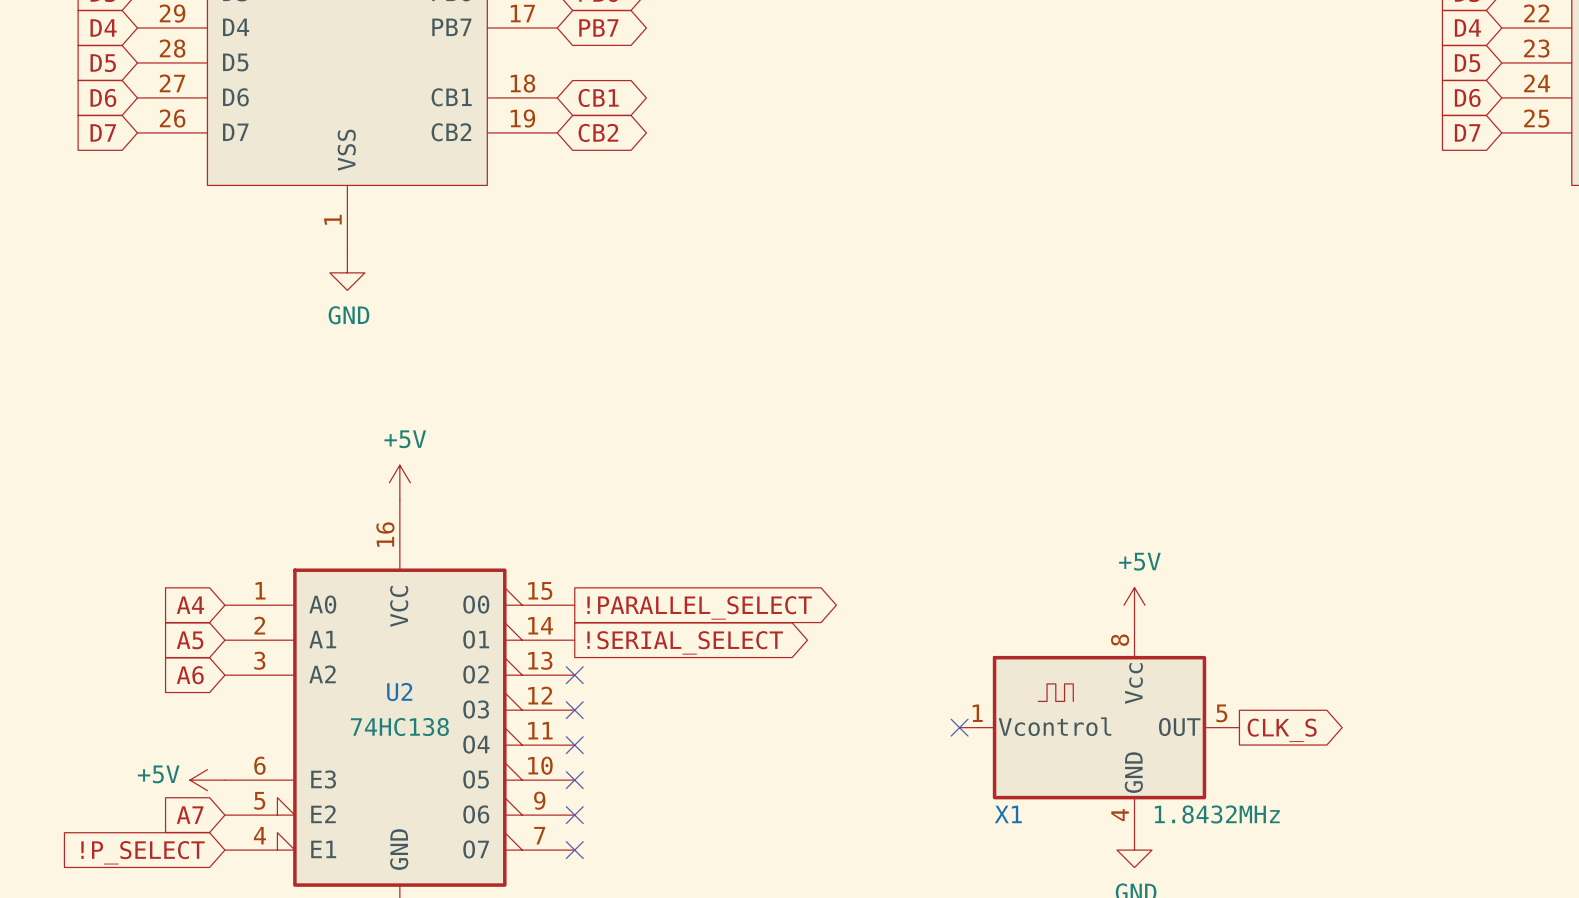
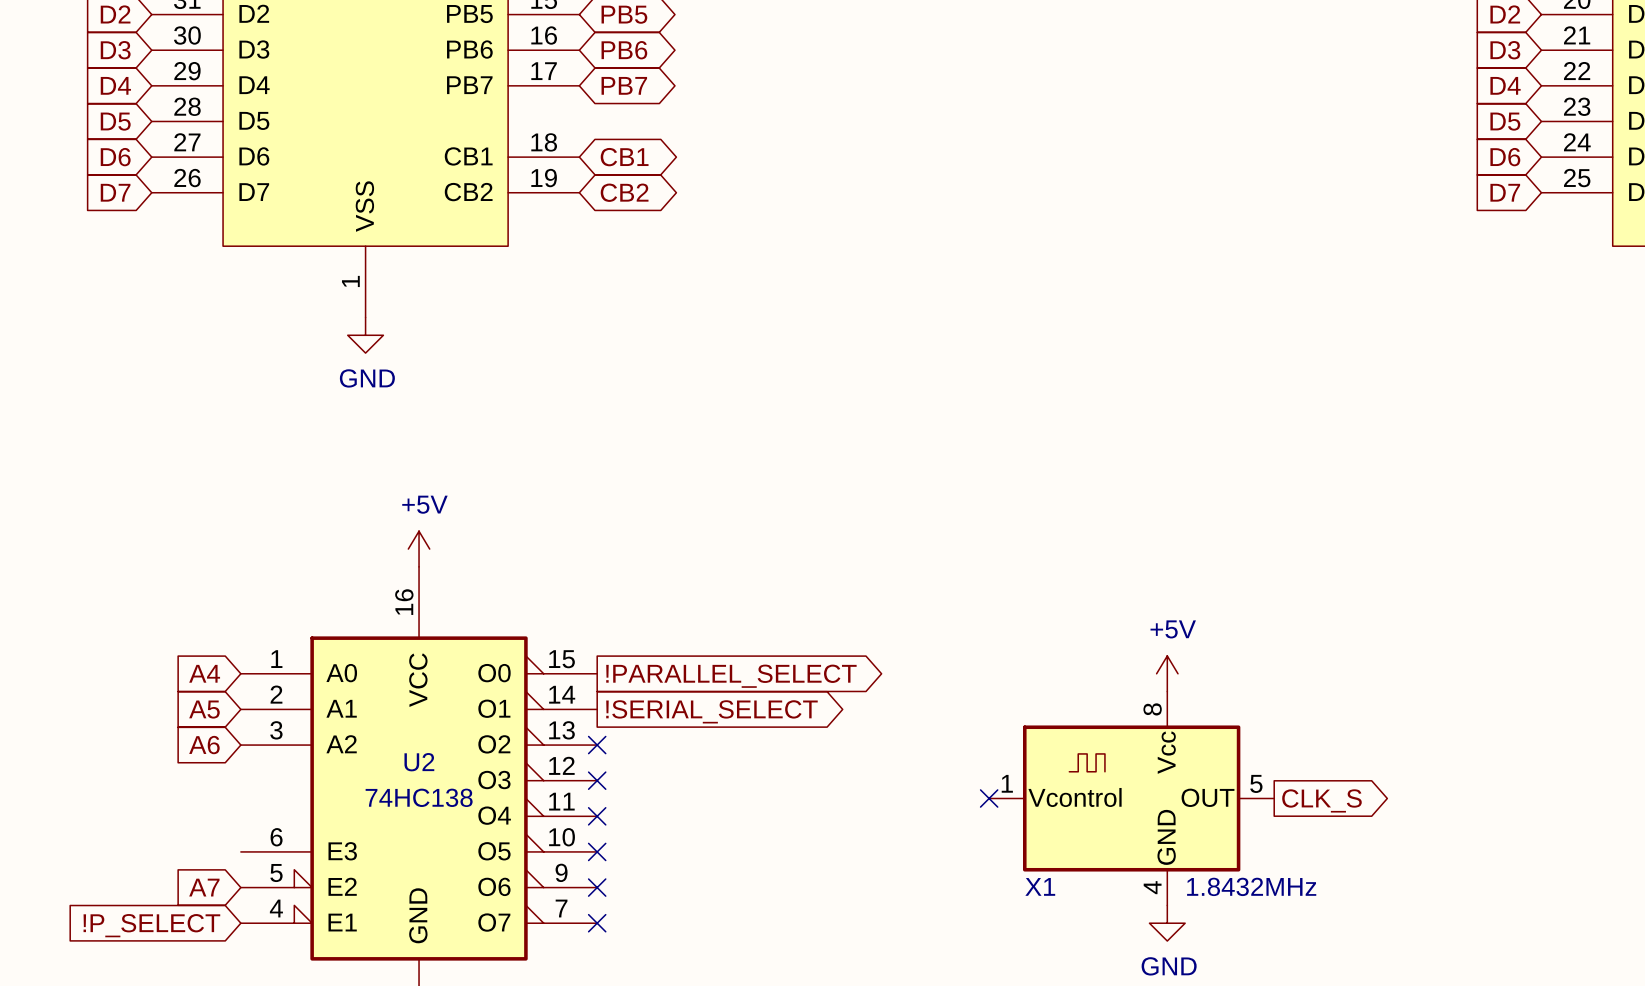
power symbol: +5V (207, 780) -> none

